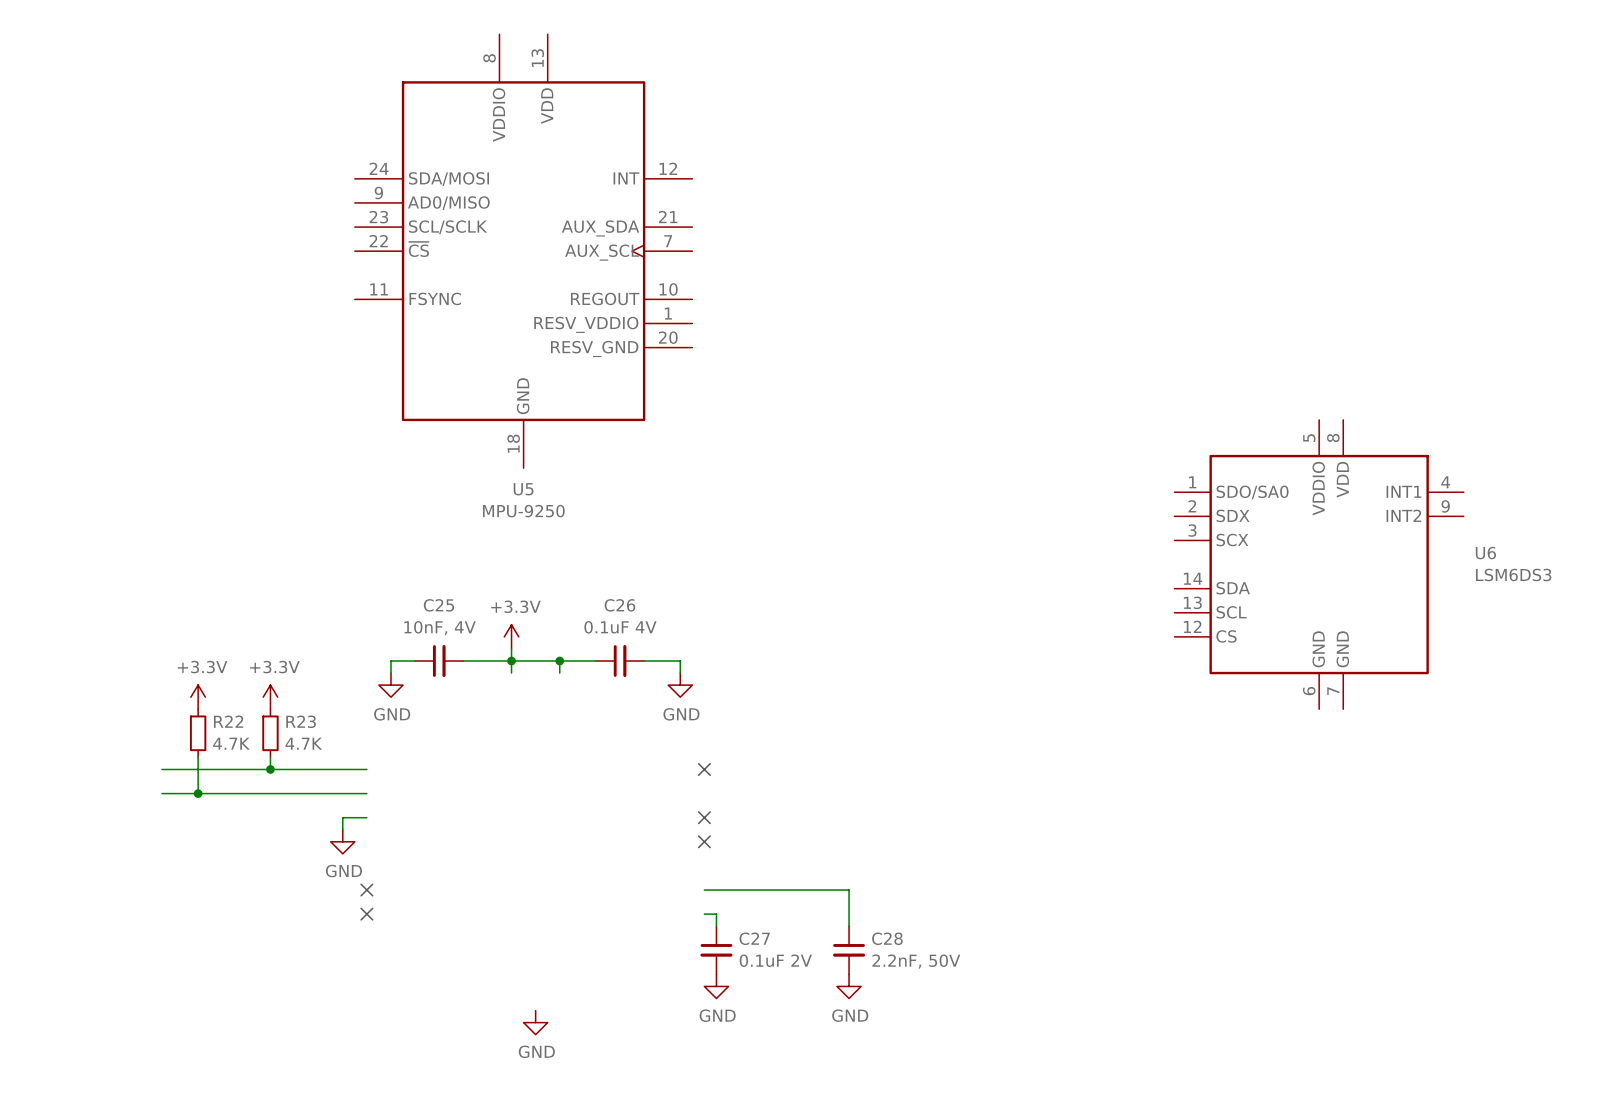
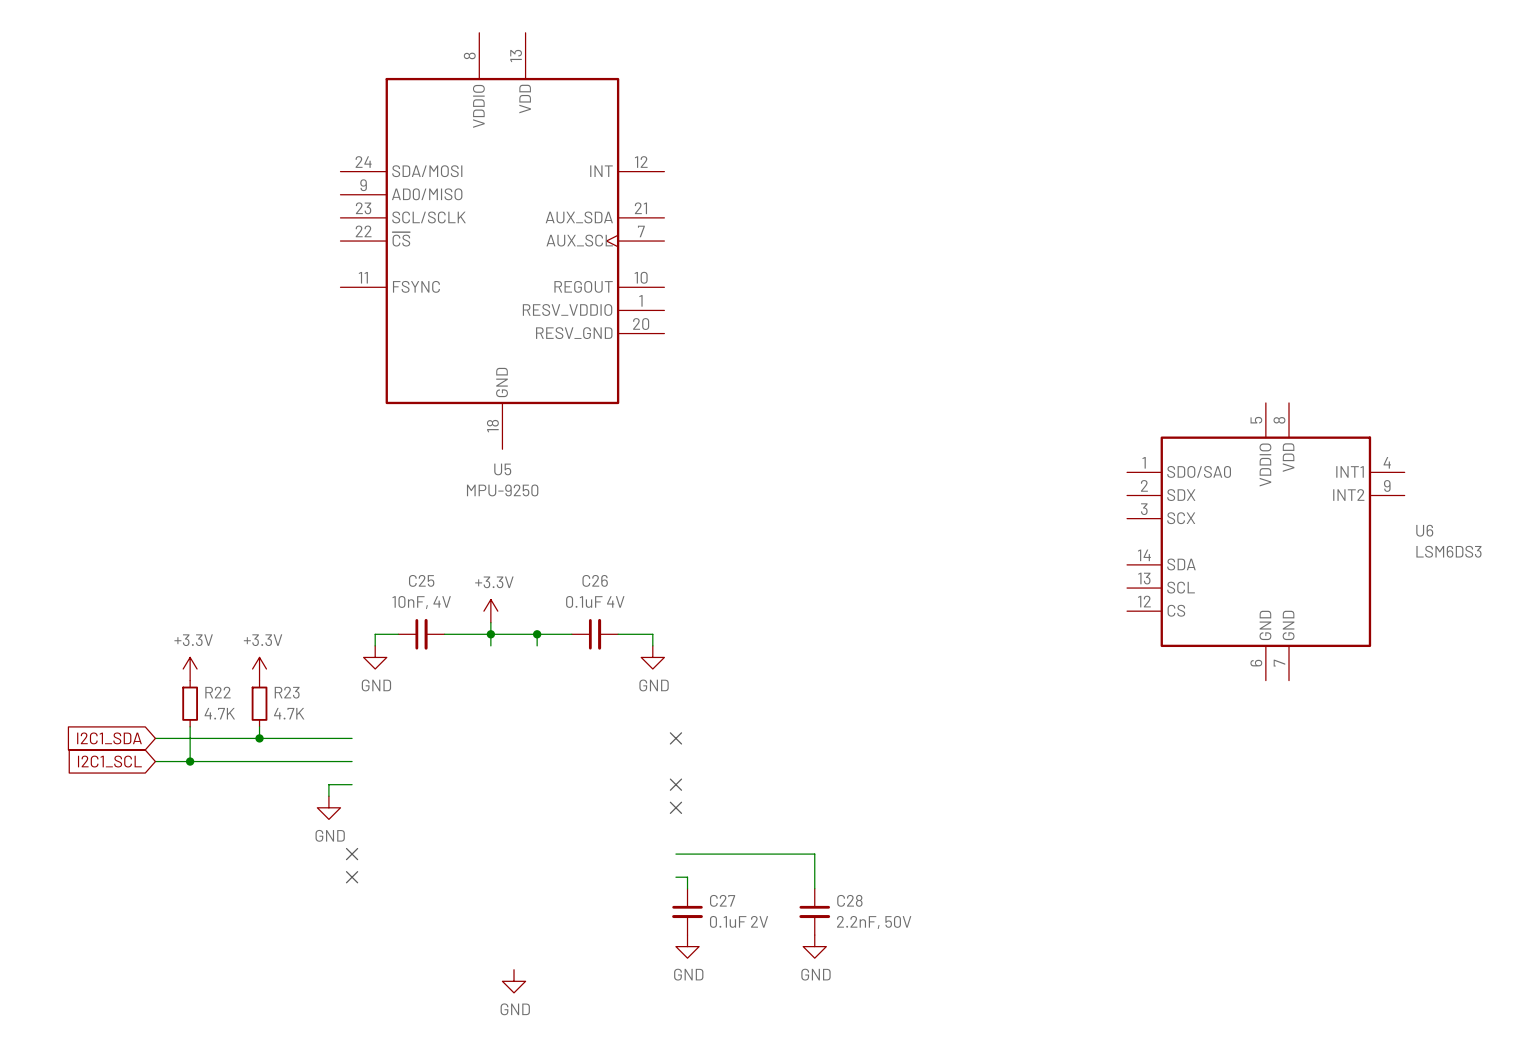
global label: none -> I2C1_SDA (109, 738)
global label: none -> I2C1_SCL (109, 761)

